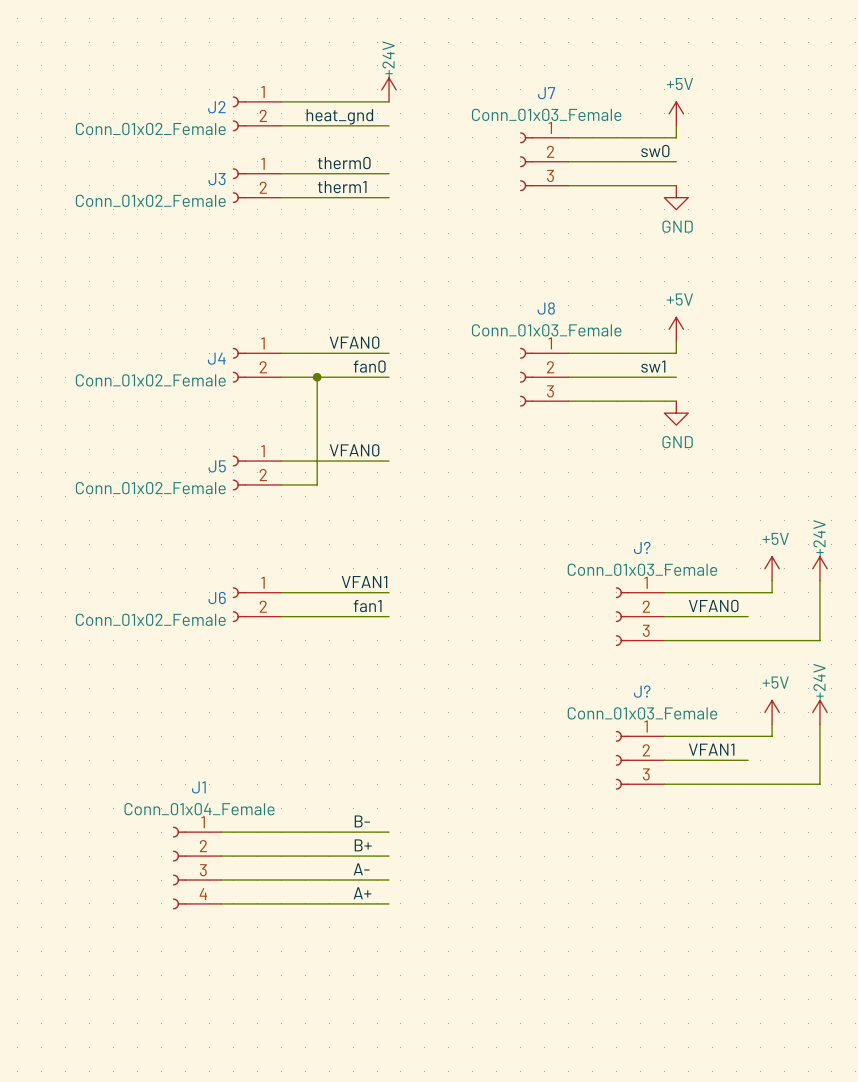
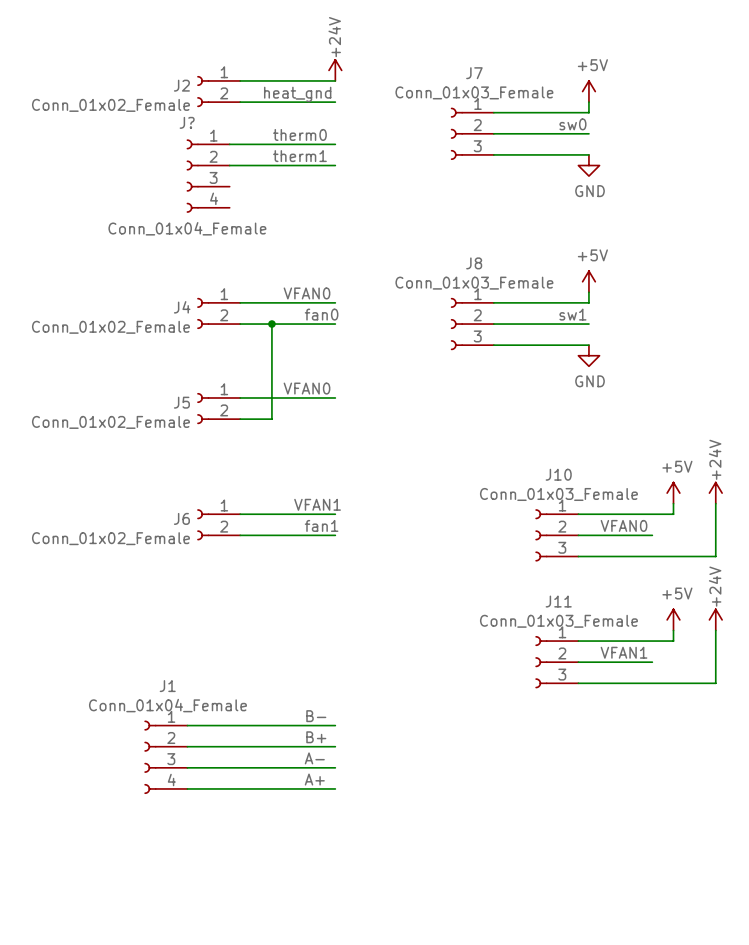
J3: Conn_01x02_Female (256, 185) -> none
J?: none -> Conn_01x04_Female (208, 176)
J? name: J? (642, 547) -> J10 (558, 474)
J? name: J? (642, 691) -> J11 (558, 601)

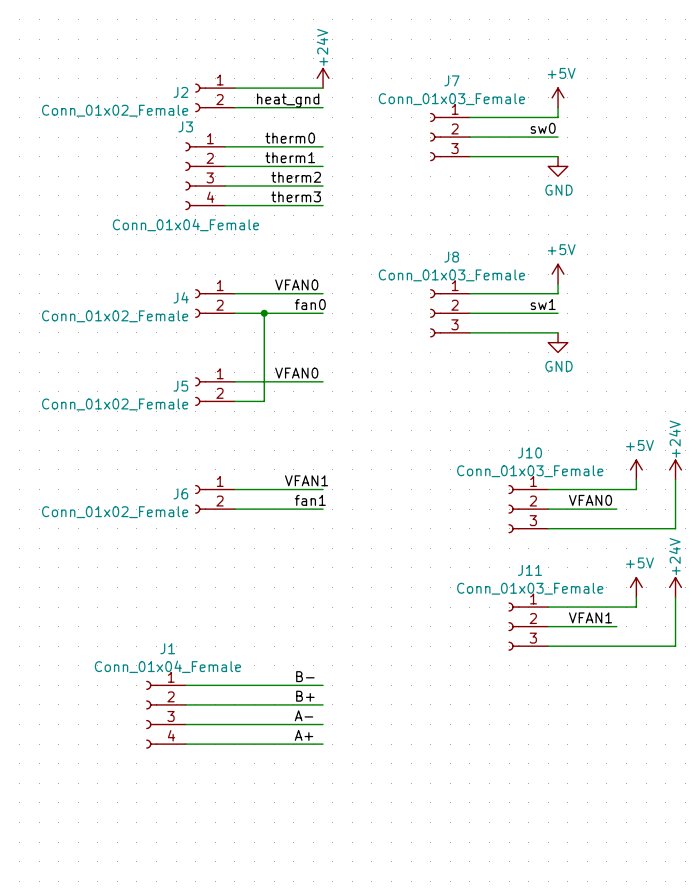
J? name: J? (187, 122) -> J3 (185, 126)
label: none -> therm2 (296, 177)
wire: none -> (225, 186) (323, 186)
label: none -> therm3 (296, 196)
wire: none -> (225, 205) (323, 205)

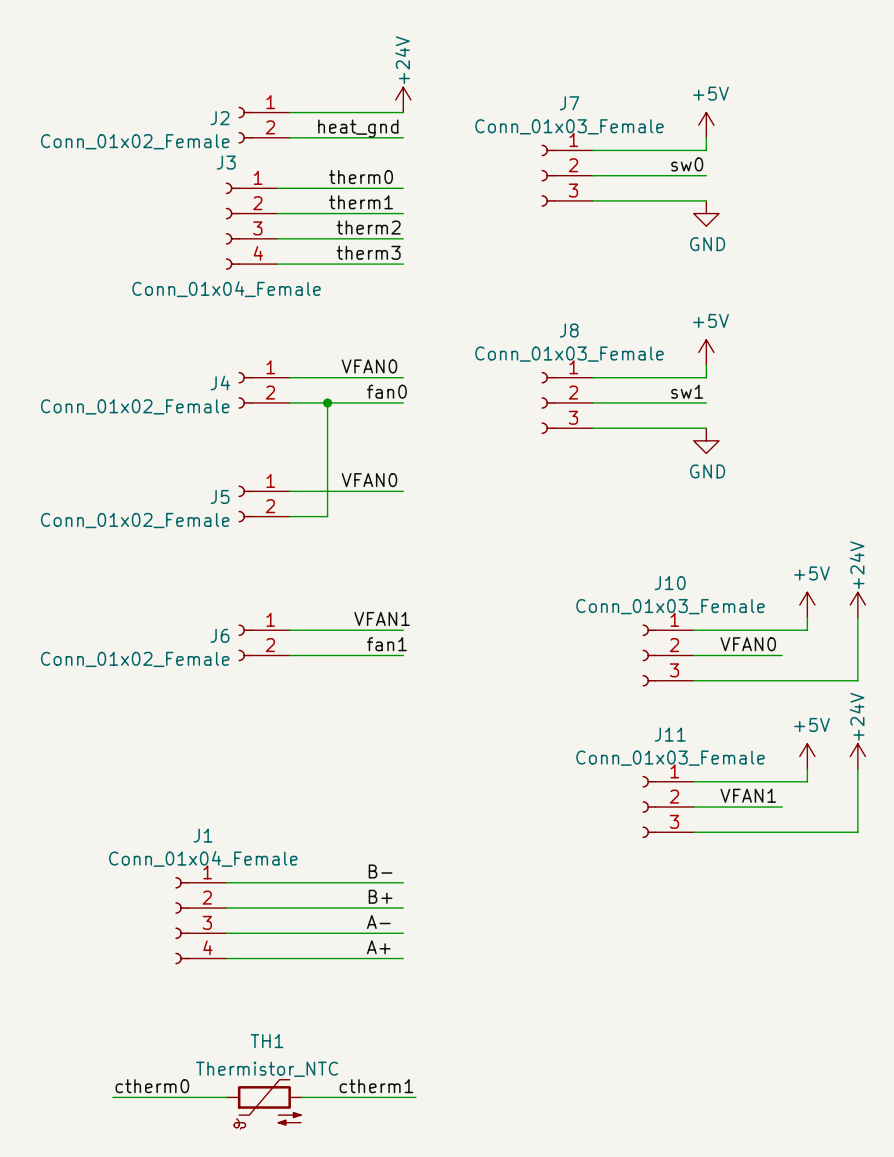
label: none -> ctherm0 (152, 1086)
label: none -> ctherm1 (376, 1086)
wire: none -> (112, 1097) (226, 1097)
wire: none -> (302, 1097) (415, 1097)
TH1: none -> Thermistor_NTC (264, 1104)

